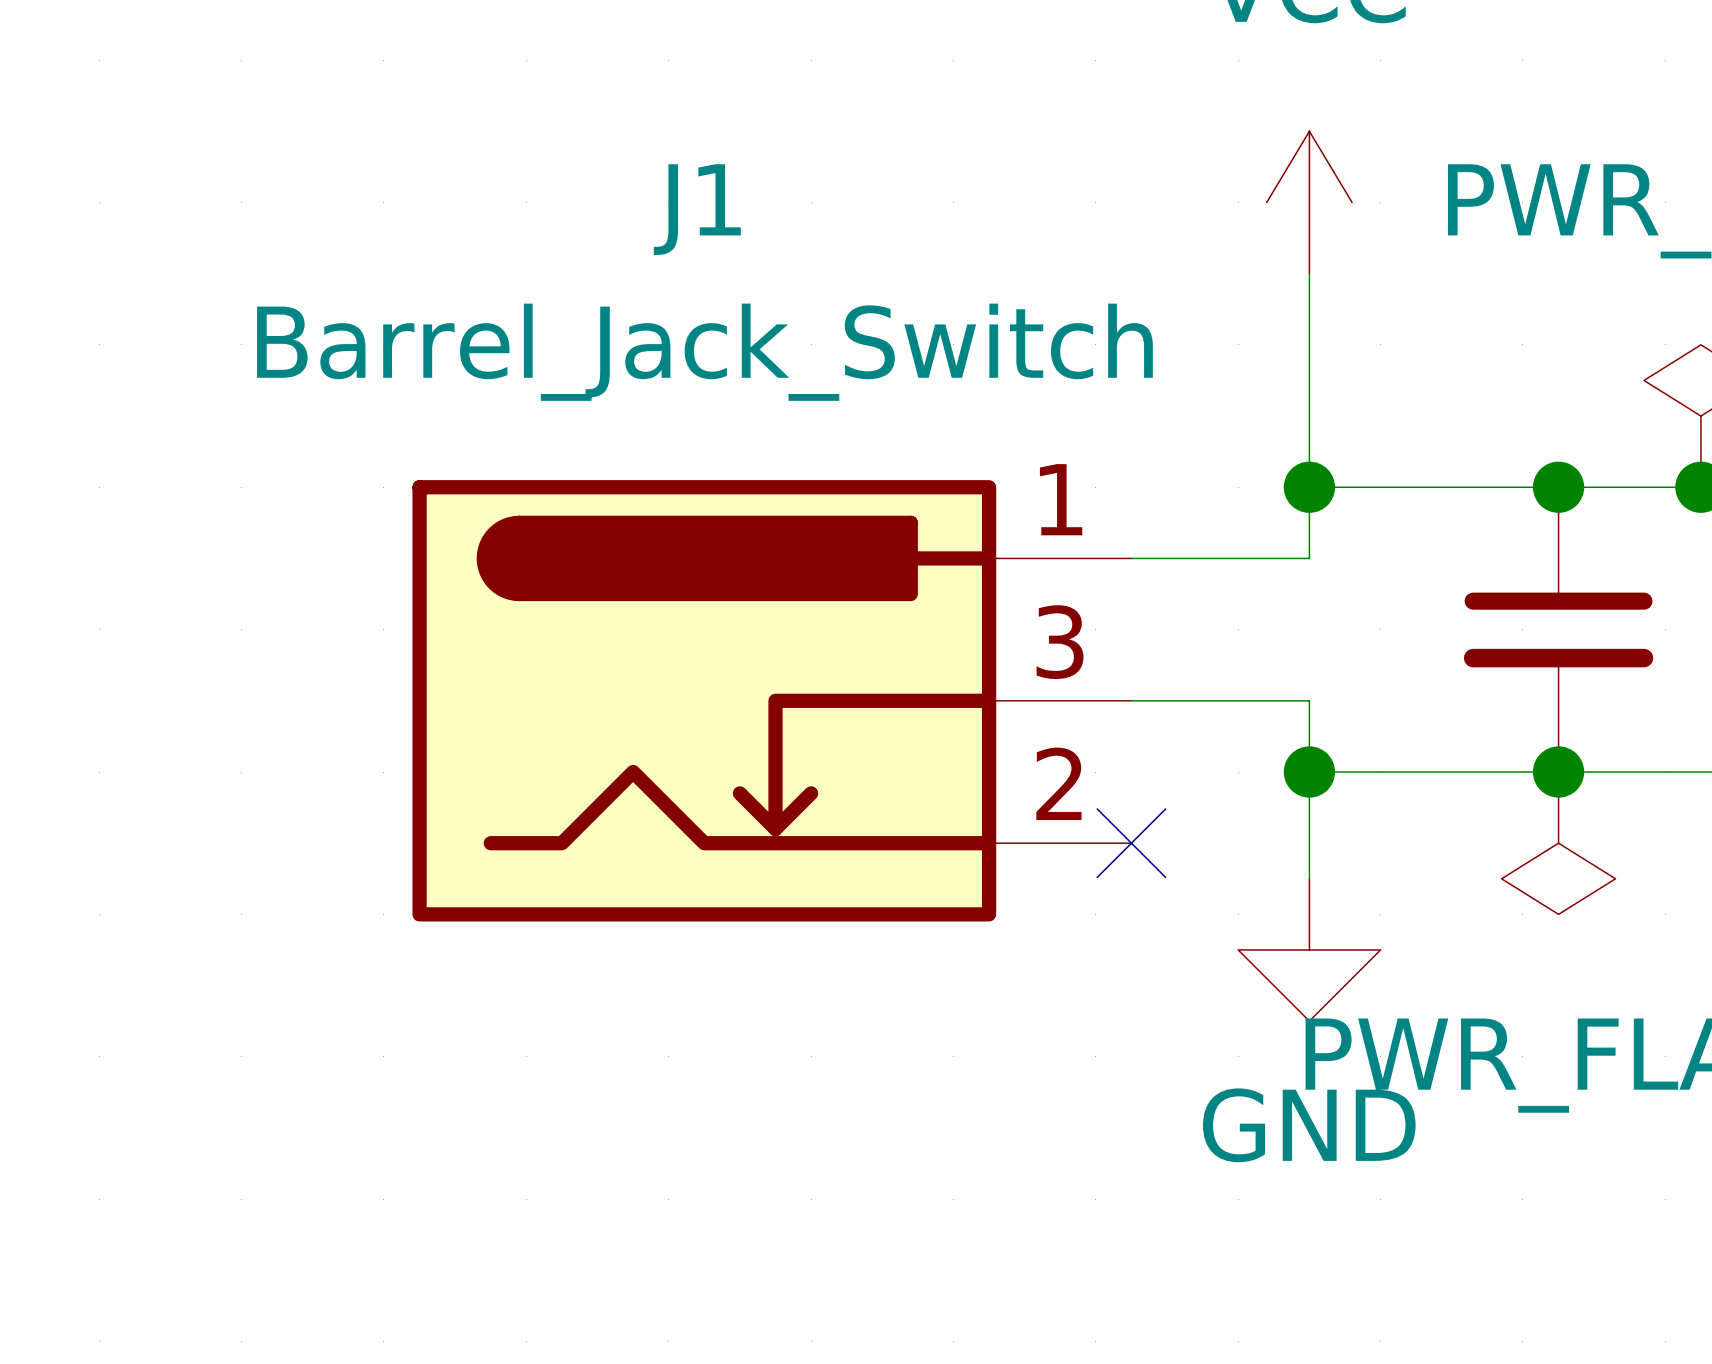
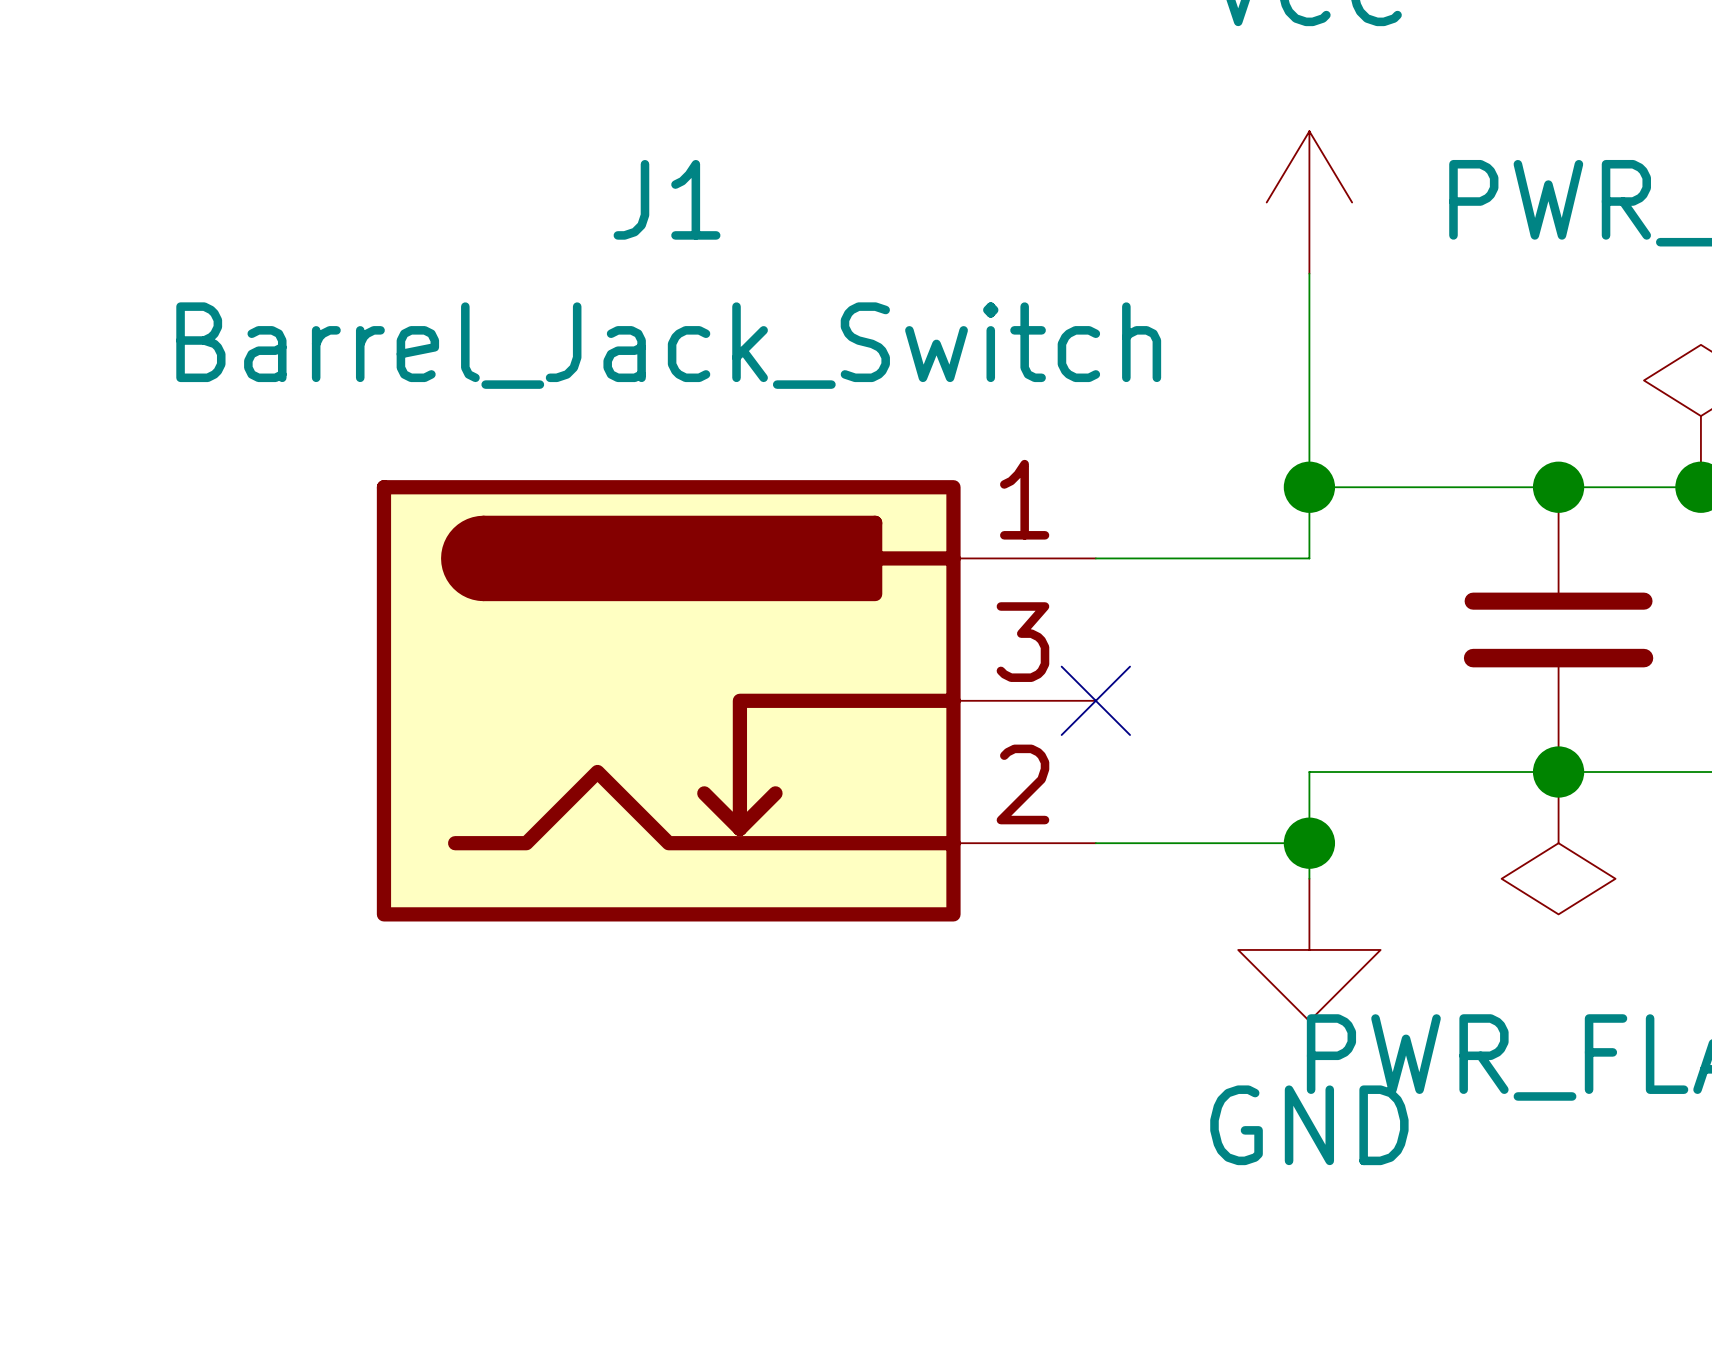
J1 position: (771, 700) -> (736, 700)
wire: (1131, 700) (1309, 700) (1309, 772) -> none
junction position: (1309, 772) -> (1309, 843)
wire: none -> (1095, 843) (1309, 843)
no-connect mark position: (1131, 843) -> (1095, 700)

